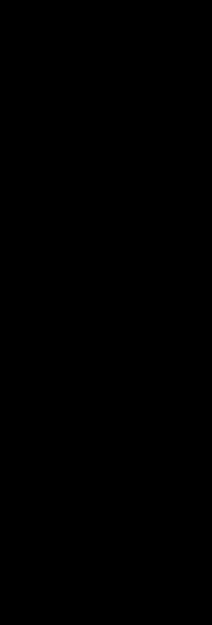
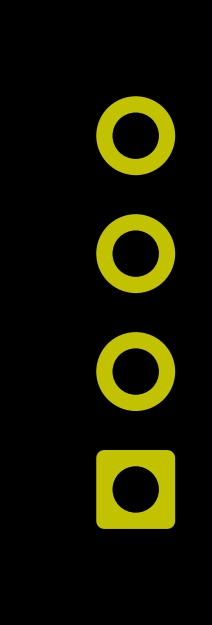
part: none -> (135, 312)

